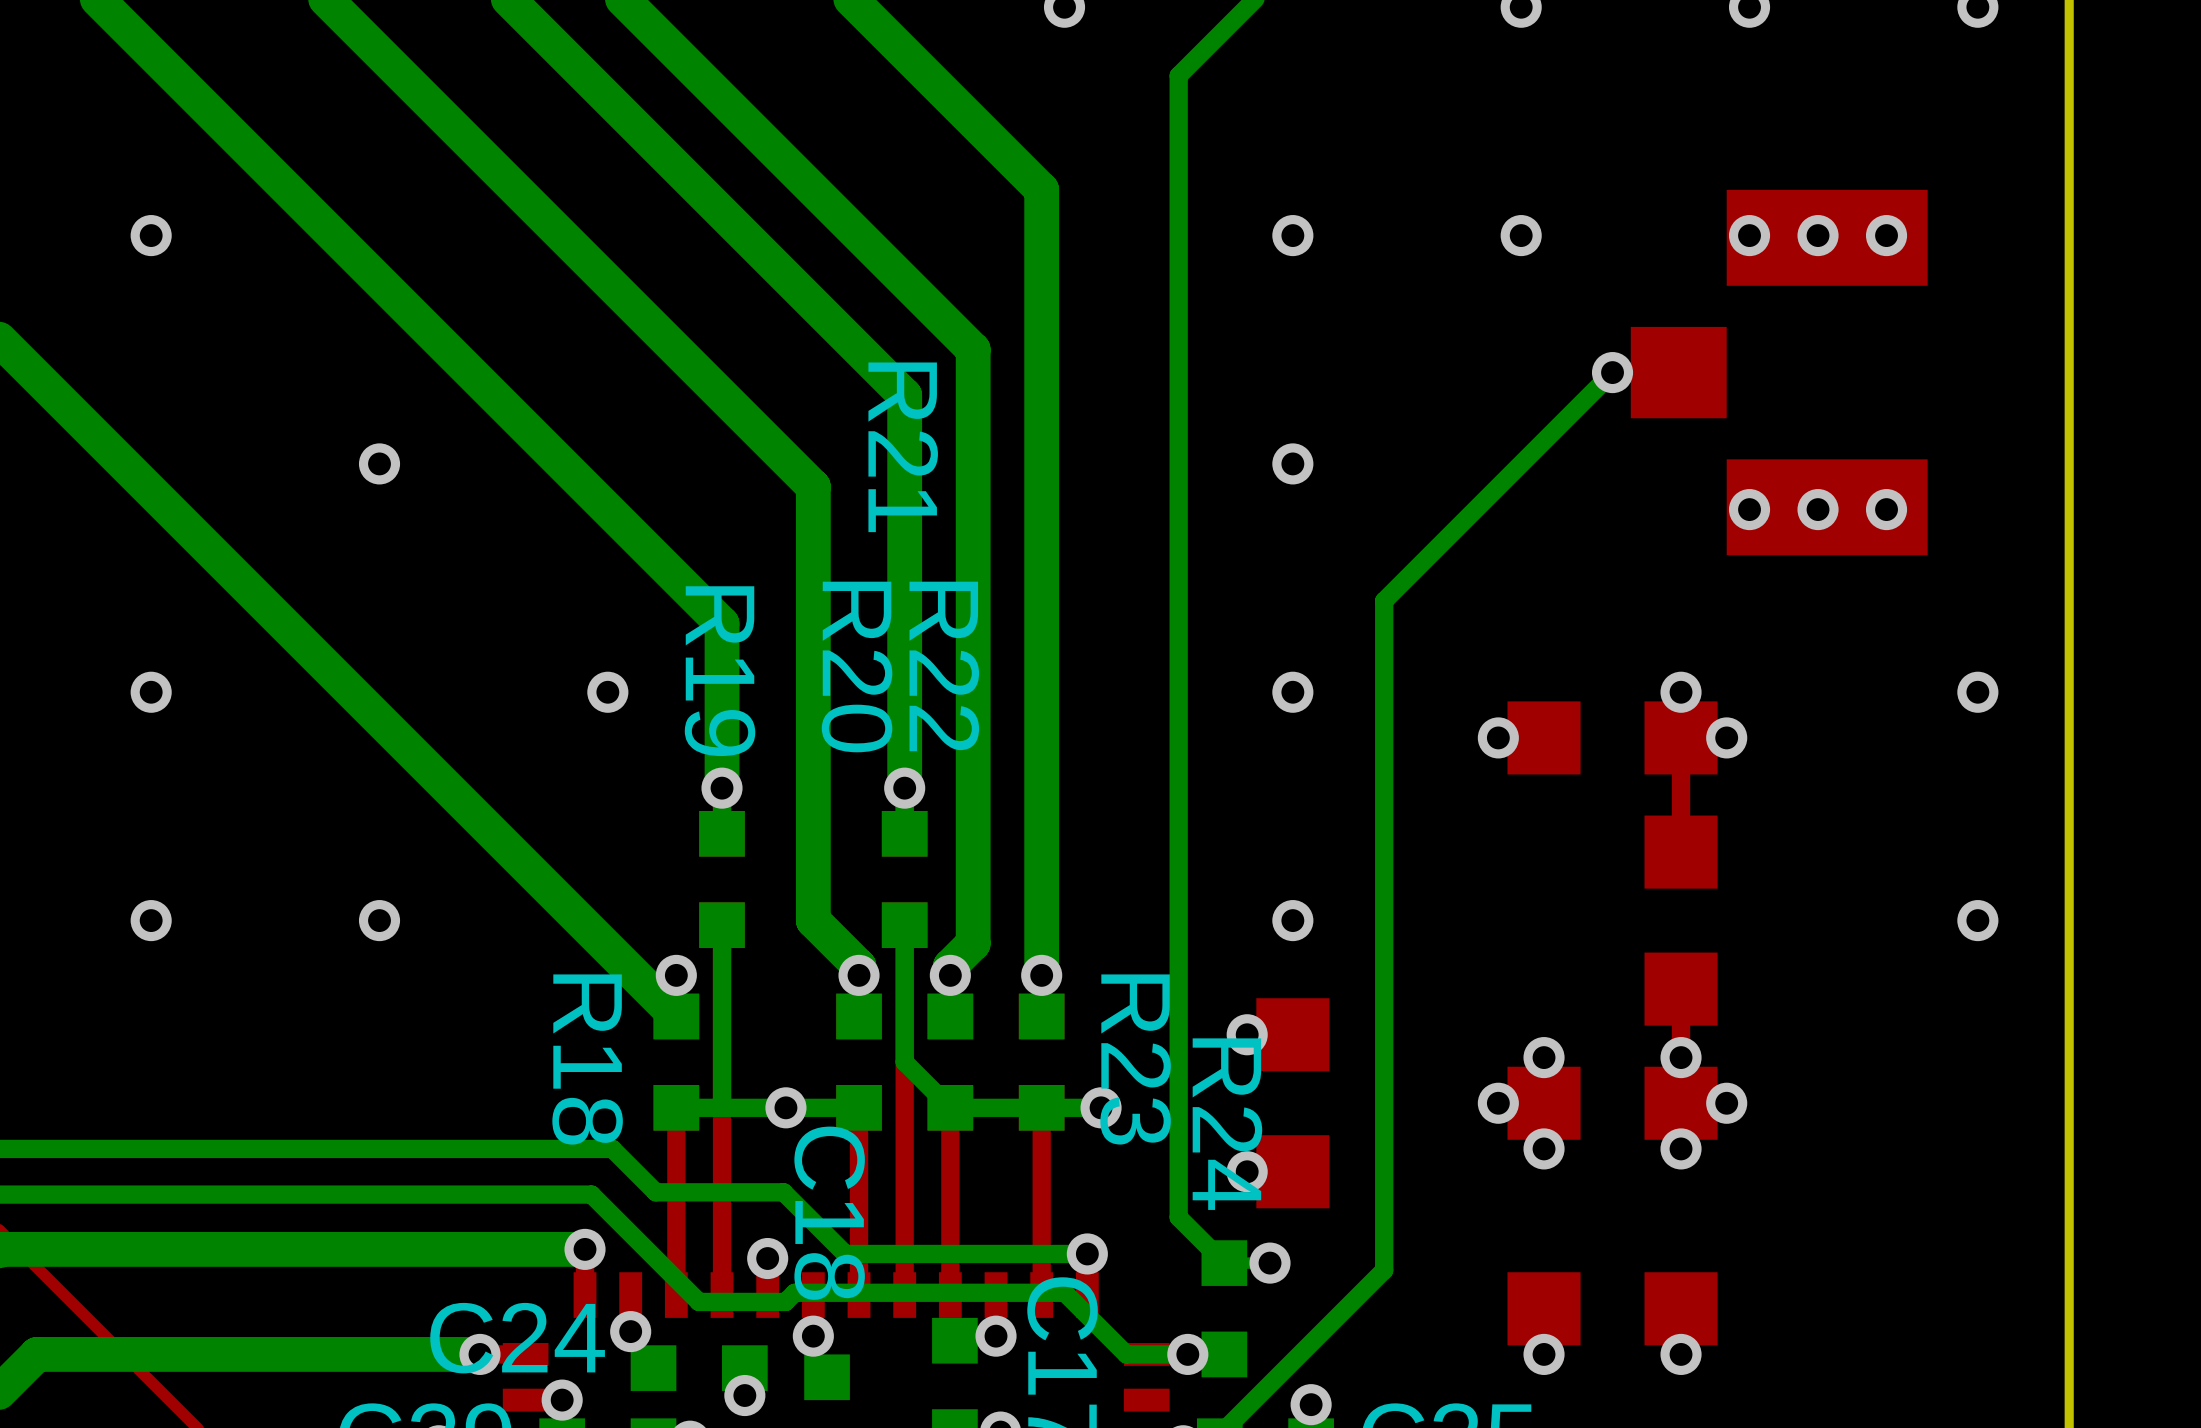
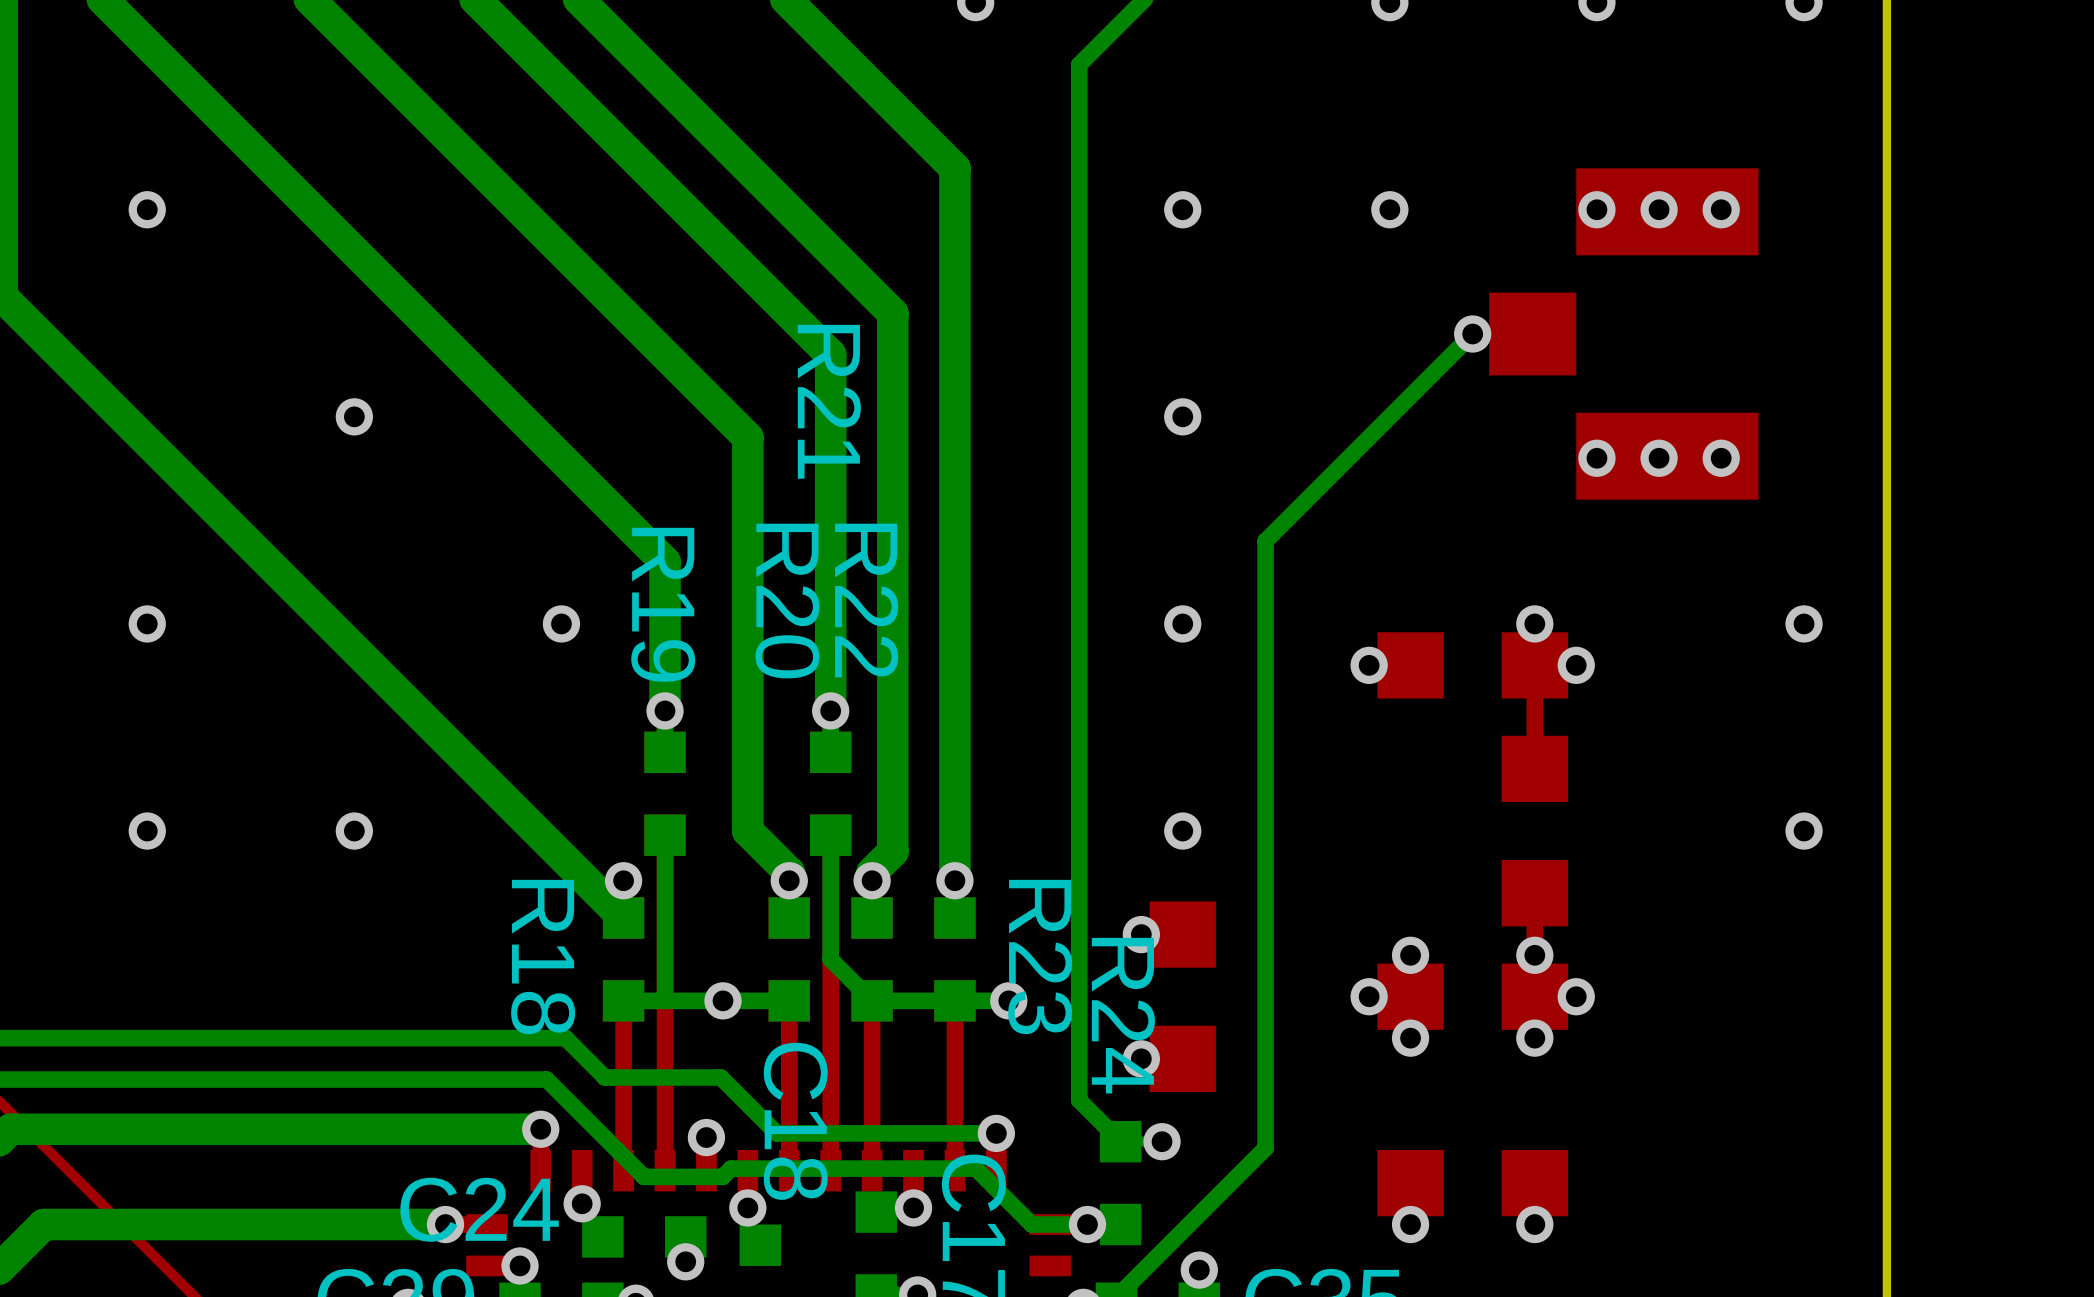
C18 name position: C18 (829, 1213) -> C18 (795, 1121)

